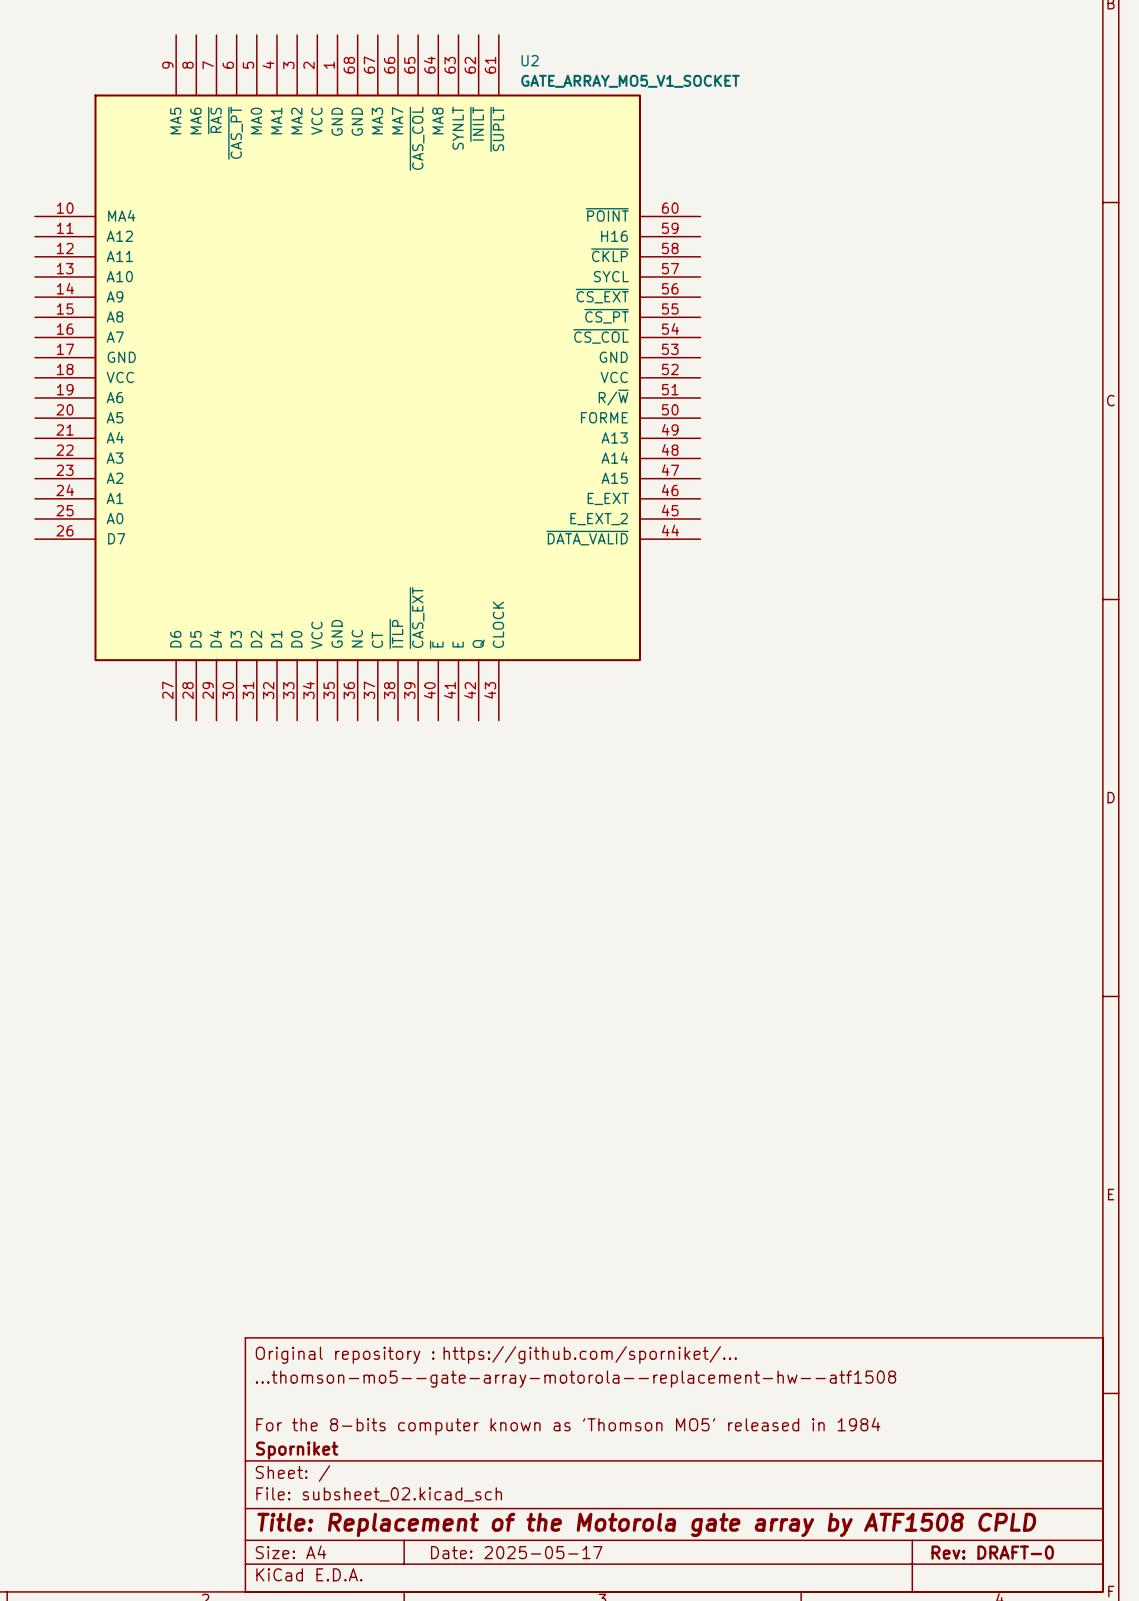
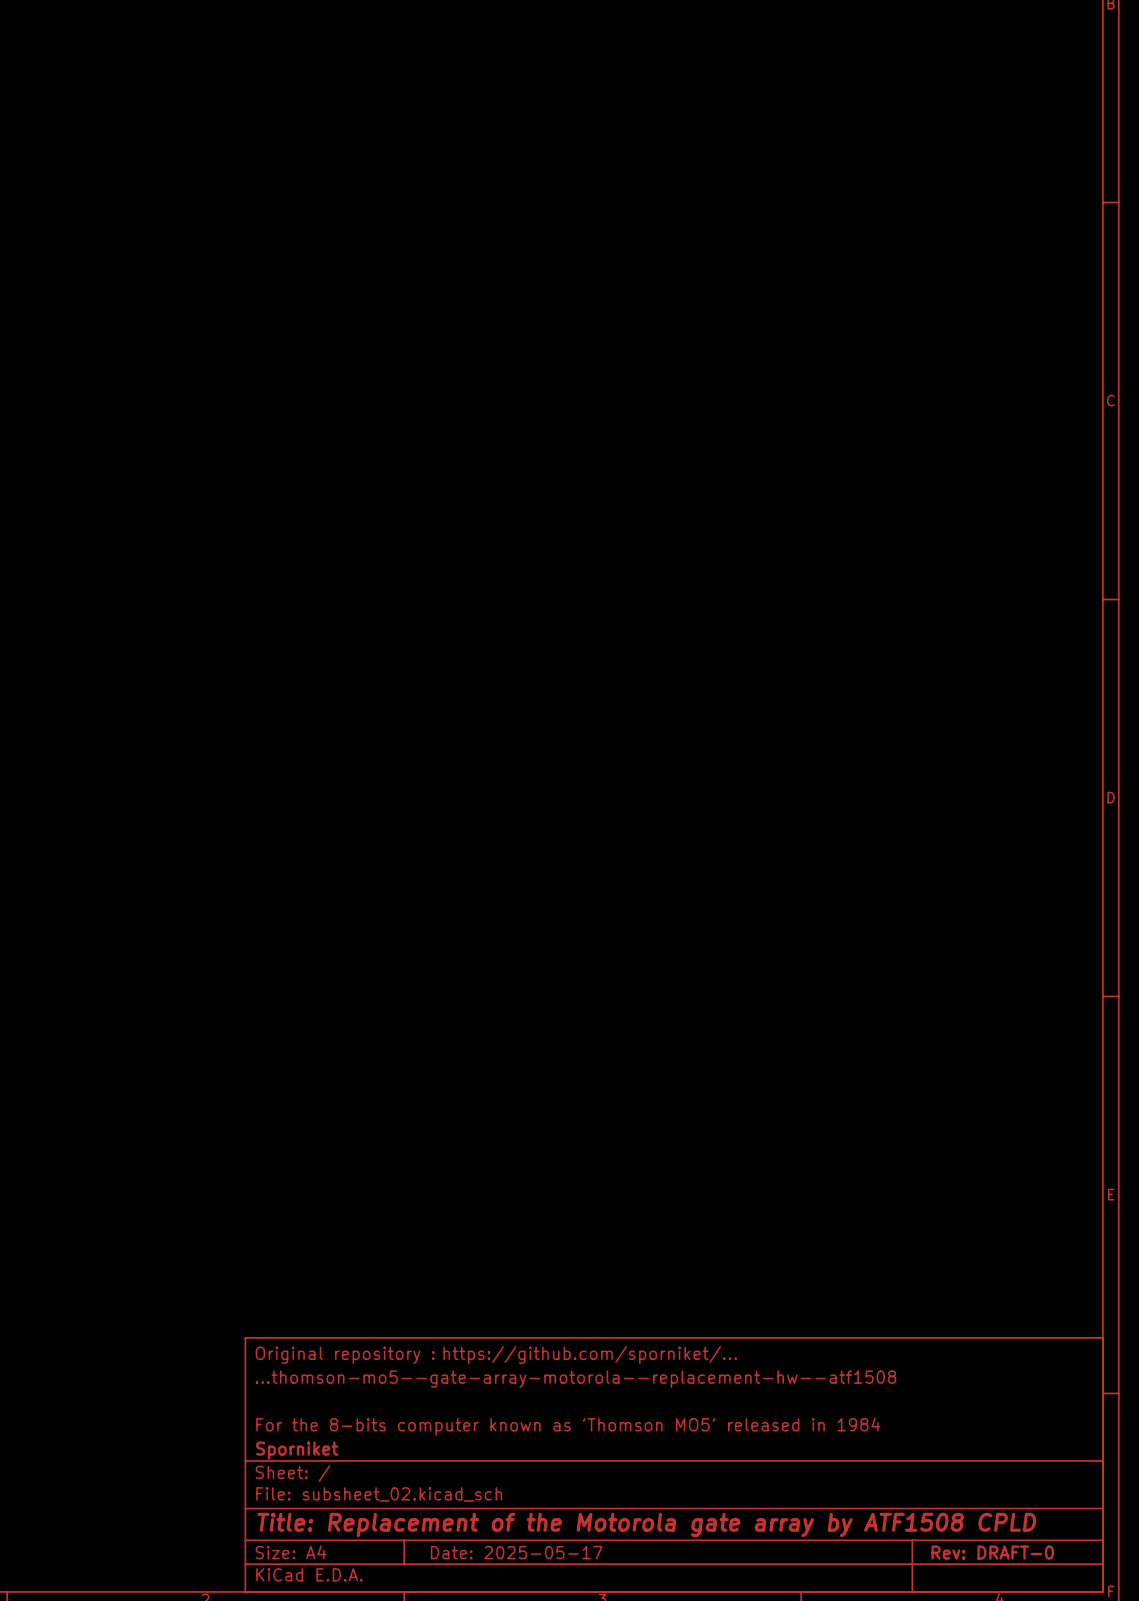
U2: GATE_ARRAY_MO5_V1_SOCKET (367, 377) -> none

